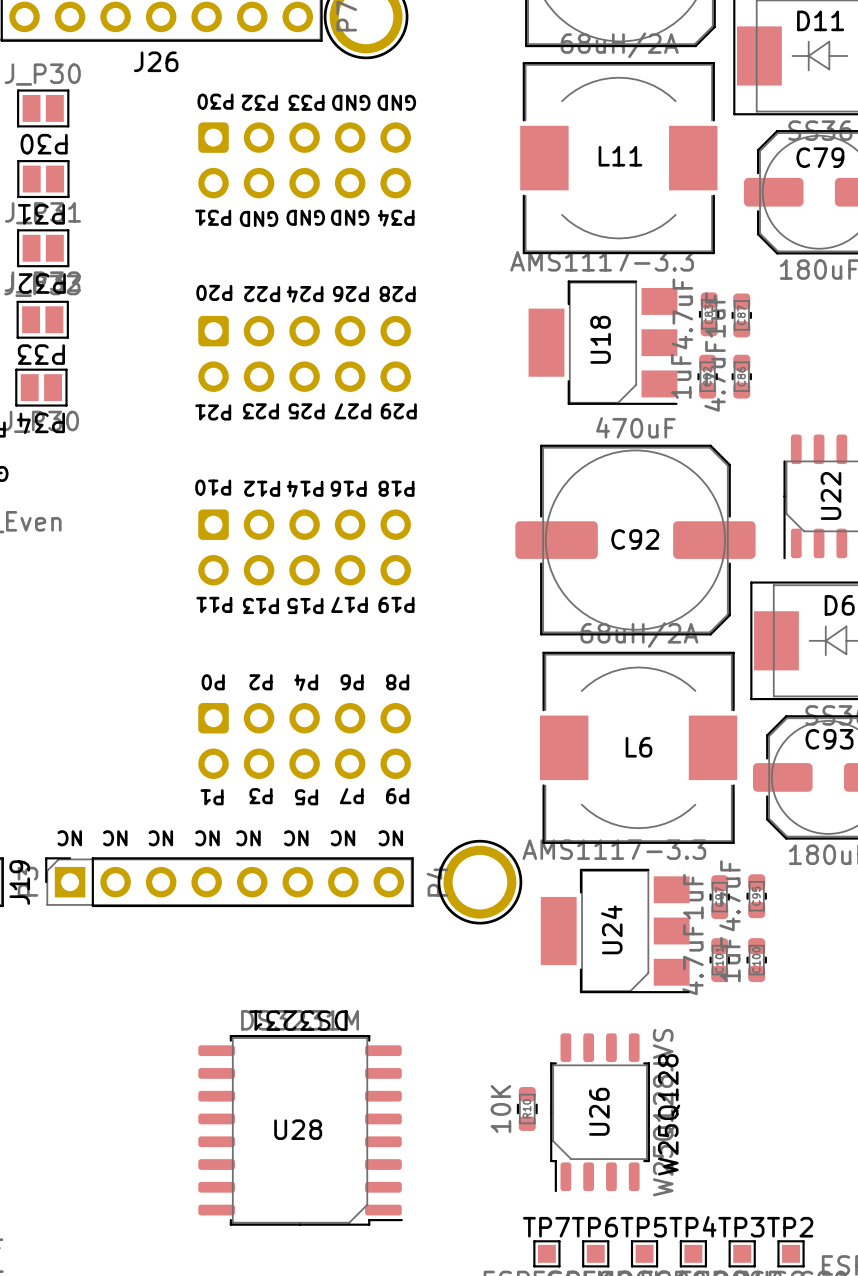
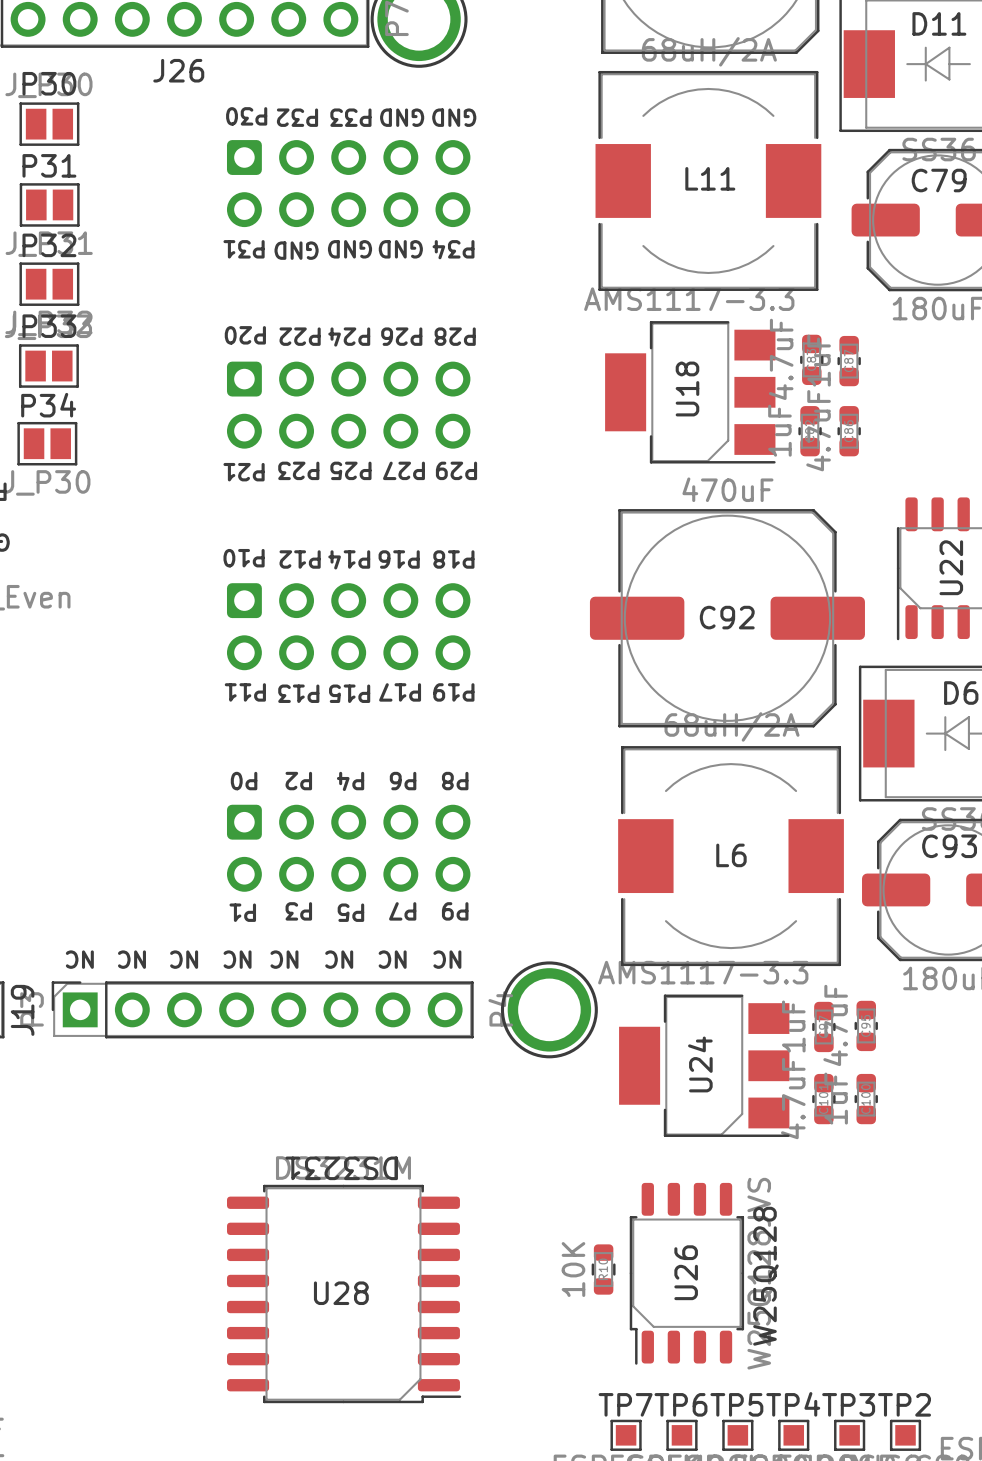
text: none -> P30 (49, 83)
text: P30 (44, 144) -> P31 (49, 165)
text: P31 (41, 214) -> P32 (49, 245)
text: P32 (42, 283) -> P33 (49, 326)
text: P33 (41, 354) -> P34 (48, 405)
text: P34 (40, 423) -> none

